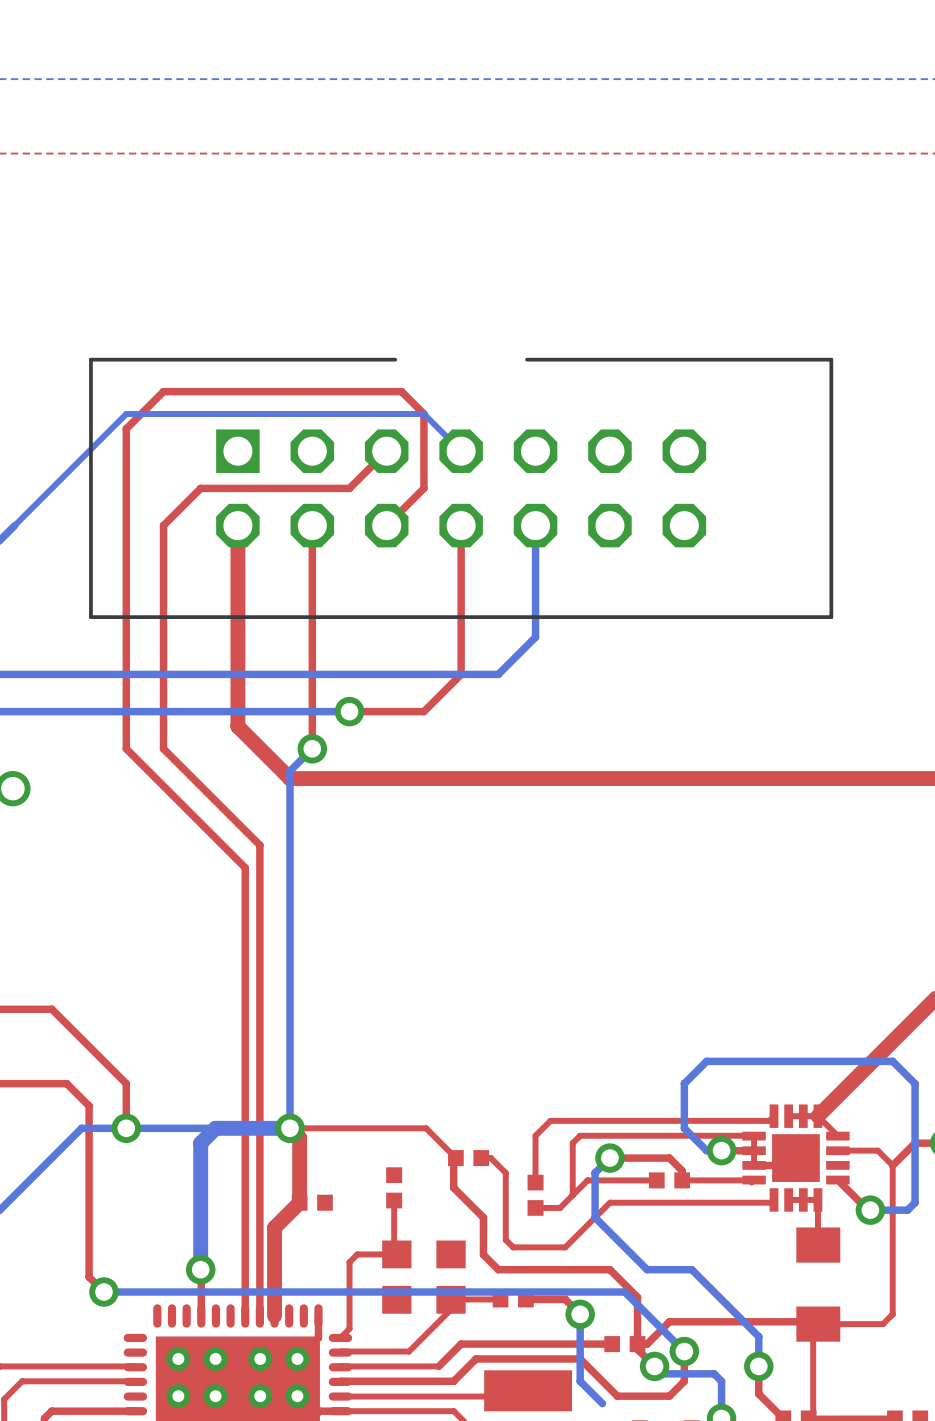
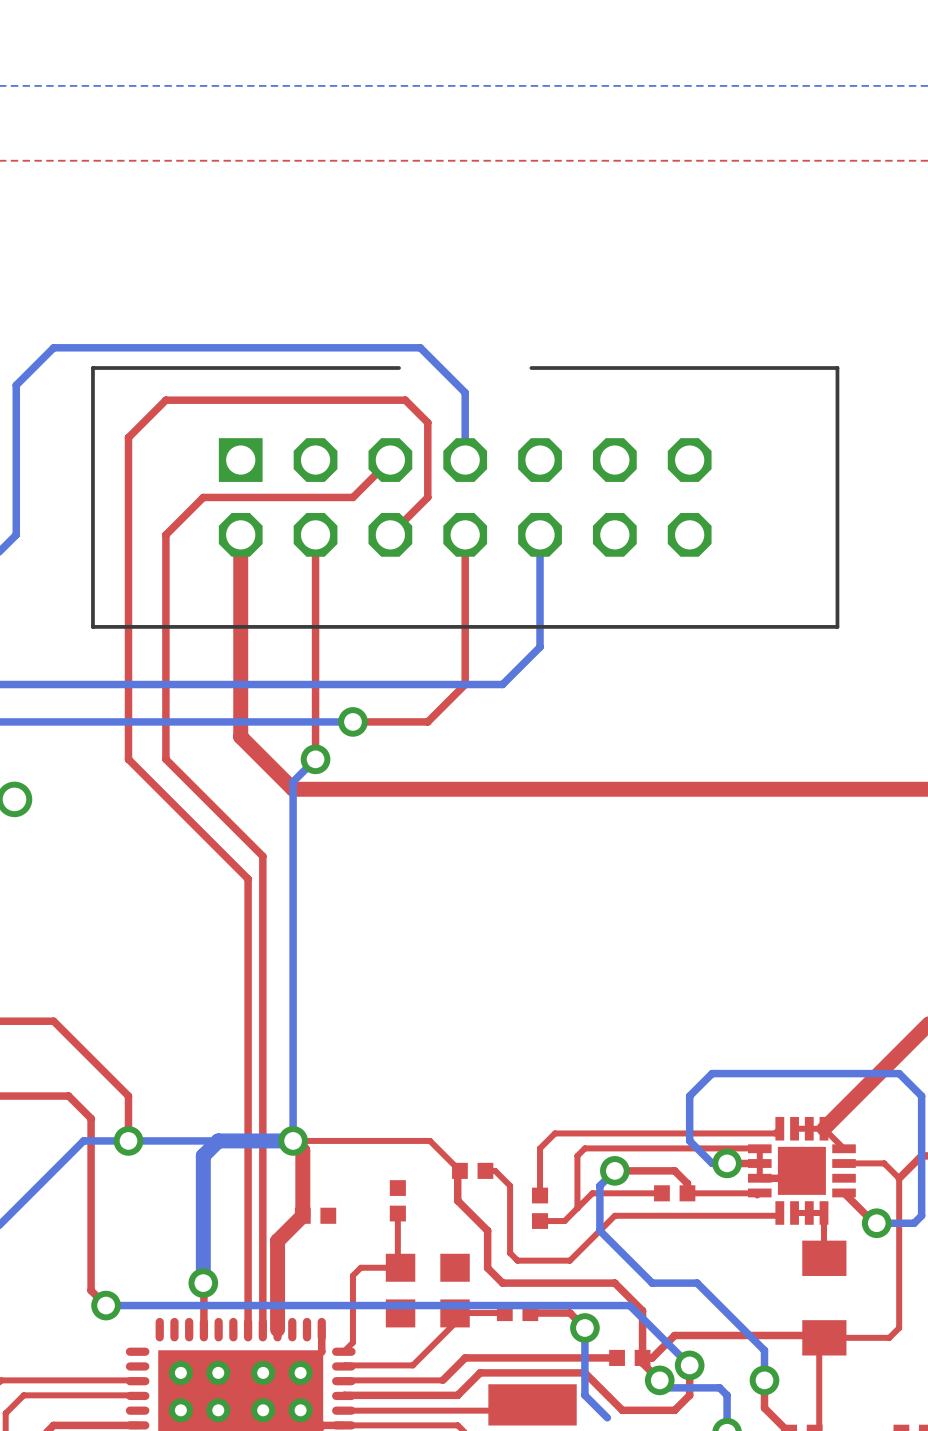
bottom track: (461, 451) (423, 413) (126, 413) (14, 525) -> (465, 460) (465, 392) (420, 347) (53, 347) (16, 385) (16, 534)

